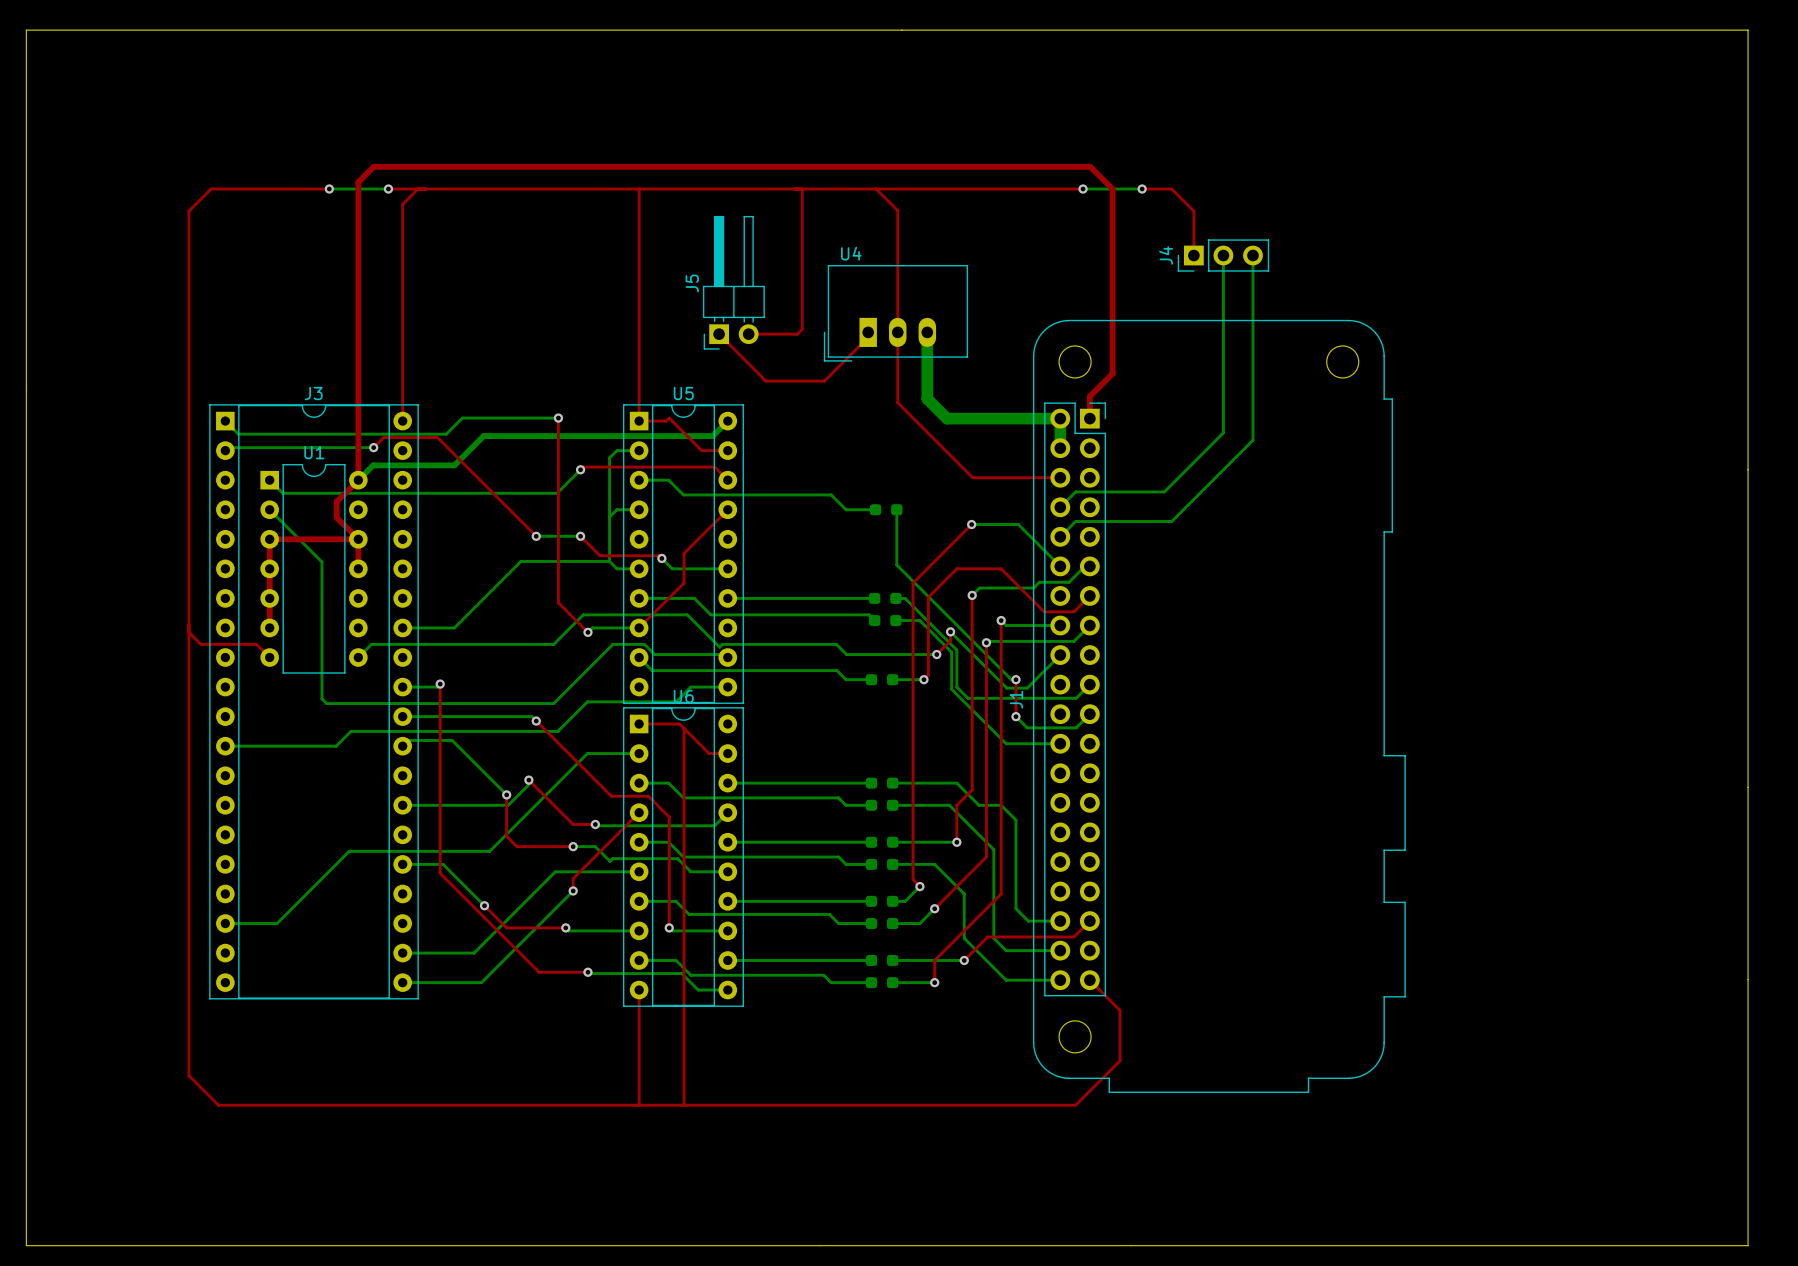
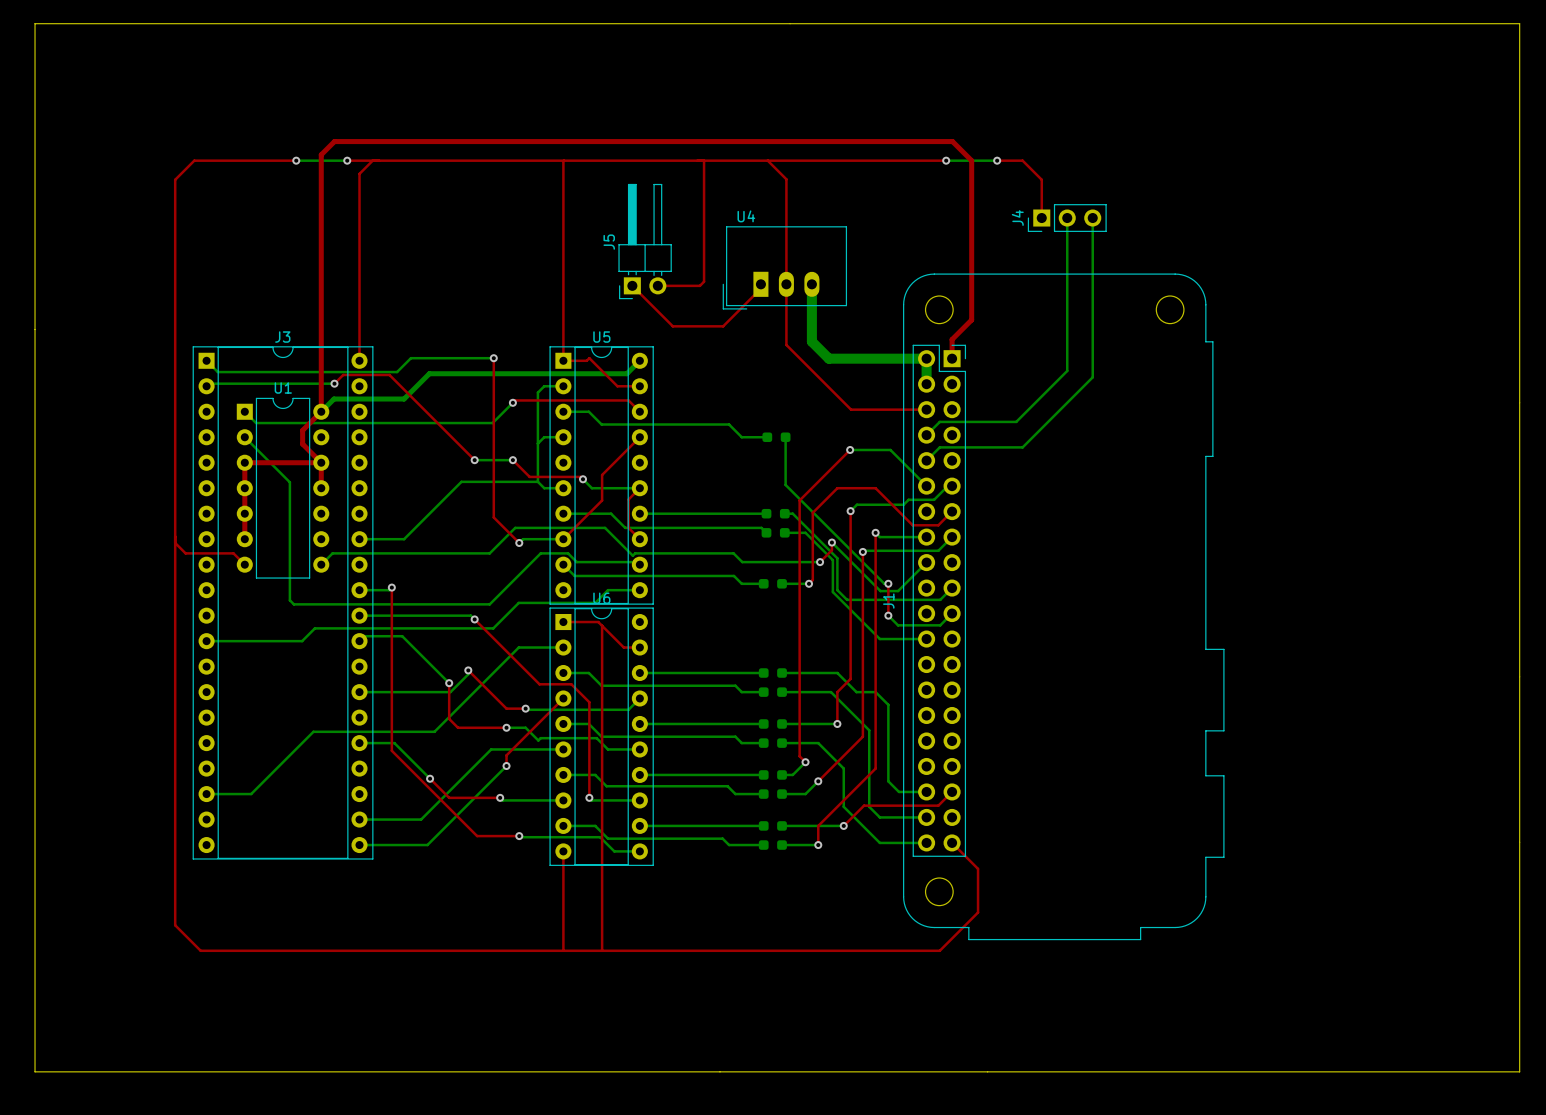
top track: none -> (639, 488) (628, 499) (628, 527) (639, 539)

